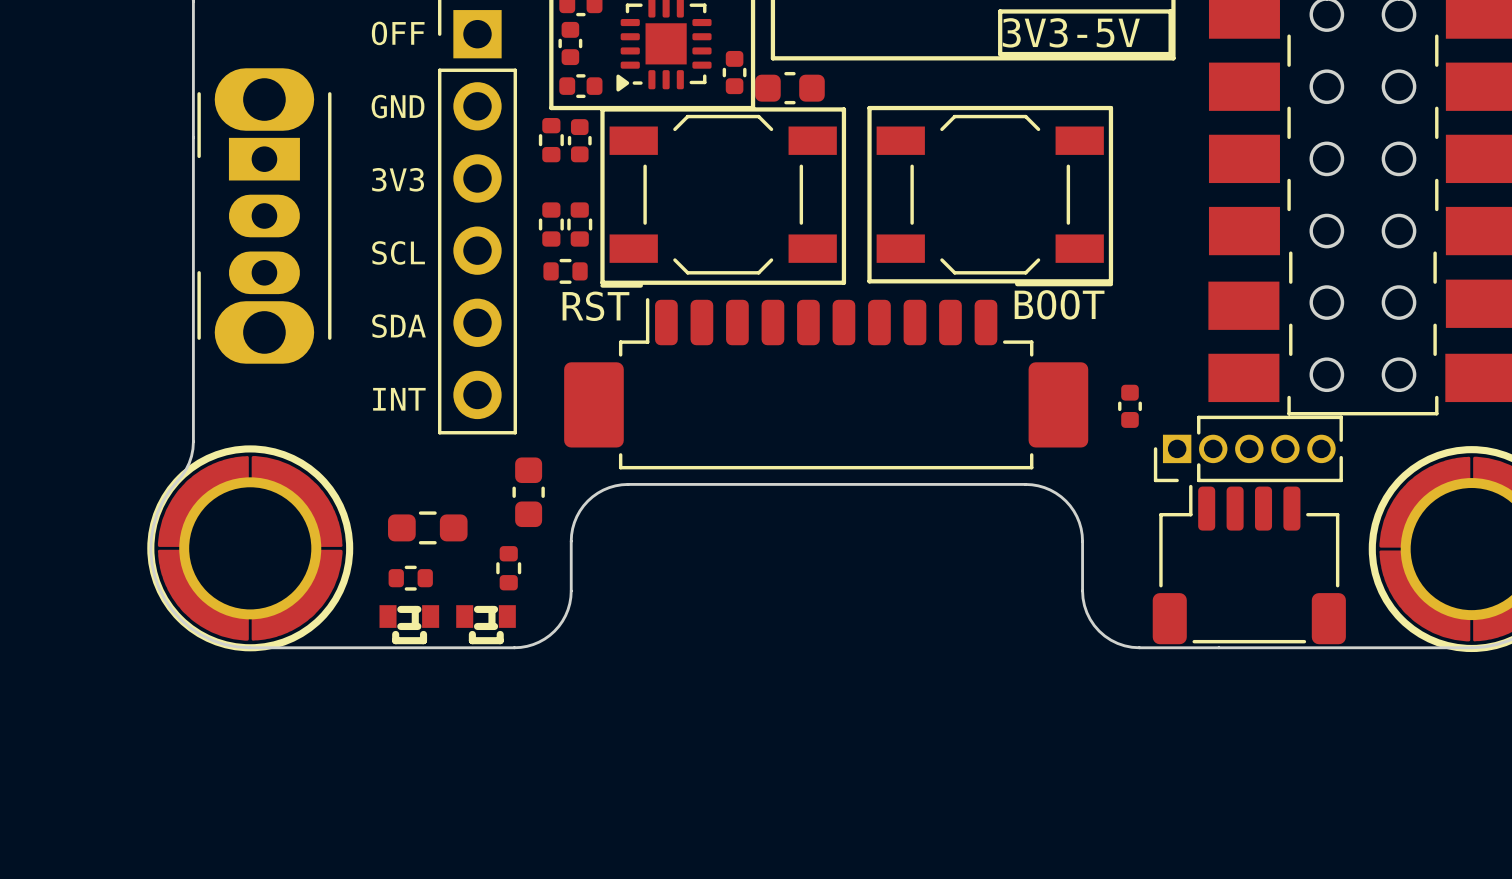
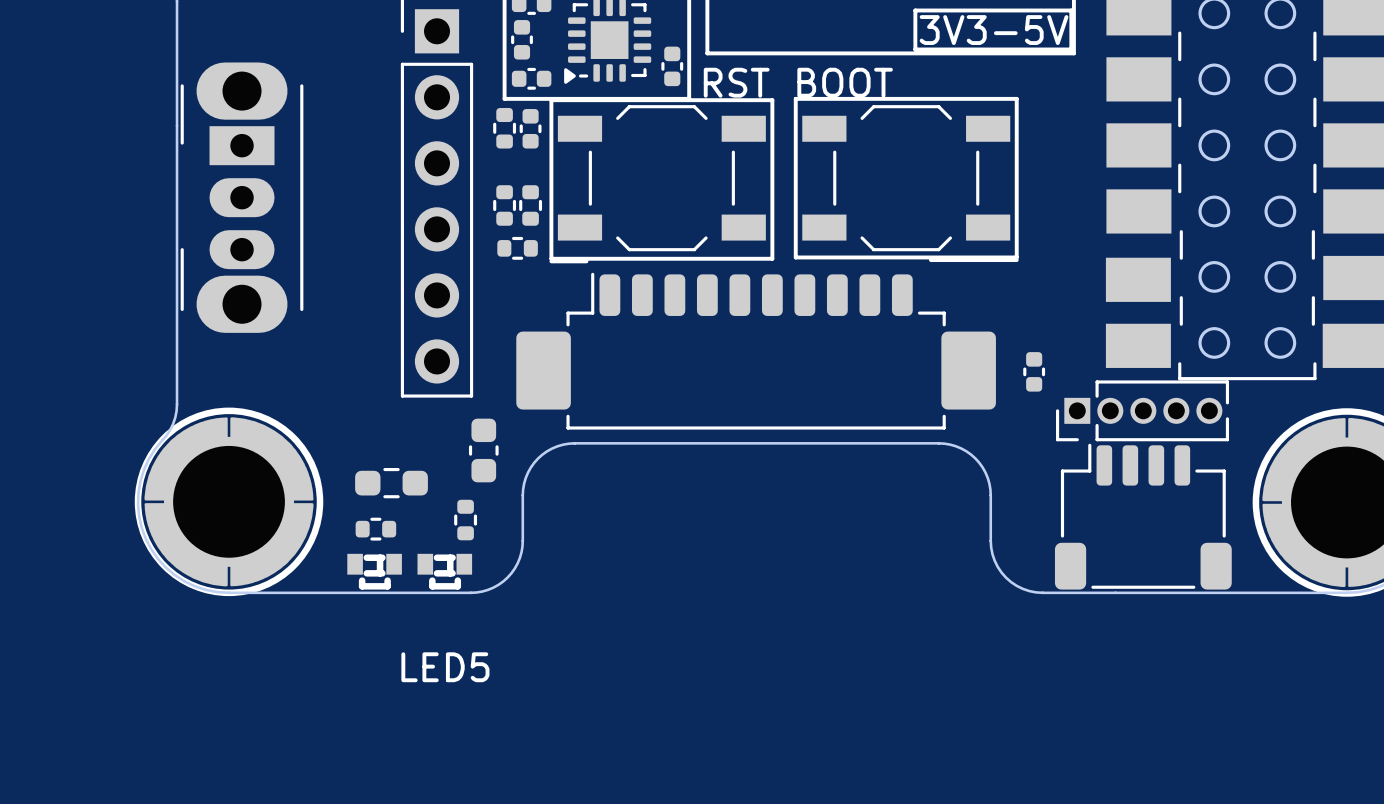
text: OFF (398, 33) -> none
part: (789, 88) -> none
text: GND (398, 106) -> none
text: 3V3 (398, 179) -> none
text: SCL (398, 252) -> none
text position: BOOT (1059, 304) -> BOOT (845, 82)
text position: RST (595, 306) -> RST (736, 82)
text: SDA (398, 326) -> none
text: INT (399, 399) -> none
LED5 name: none -> LED5 (445, 667)

